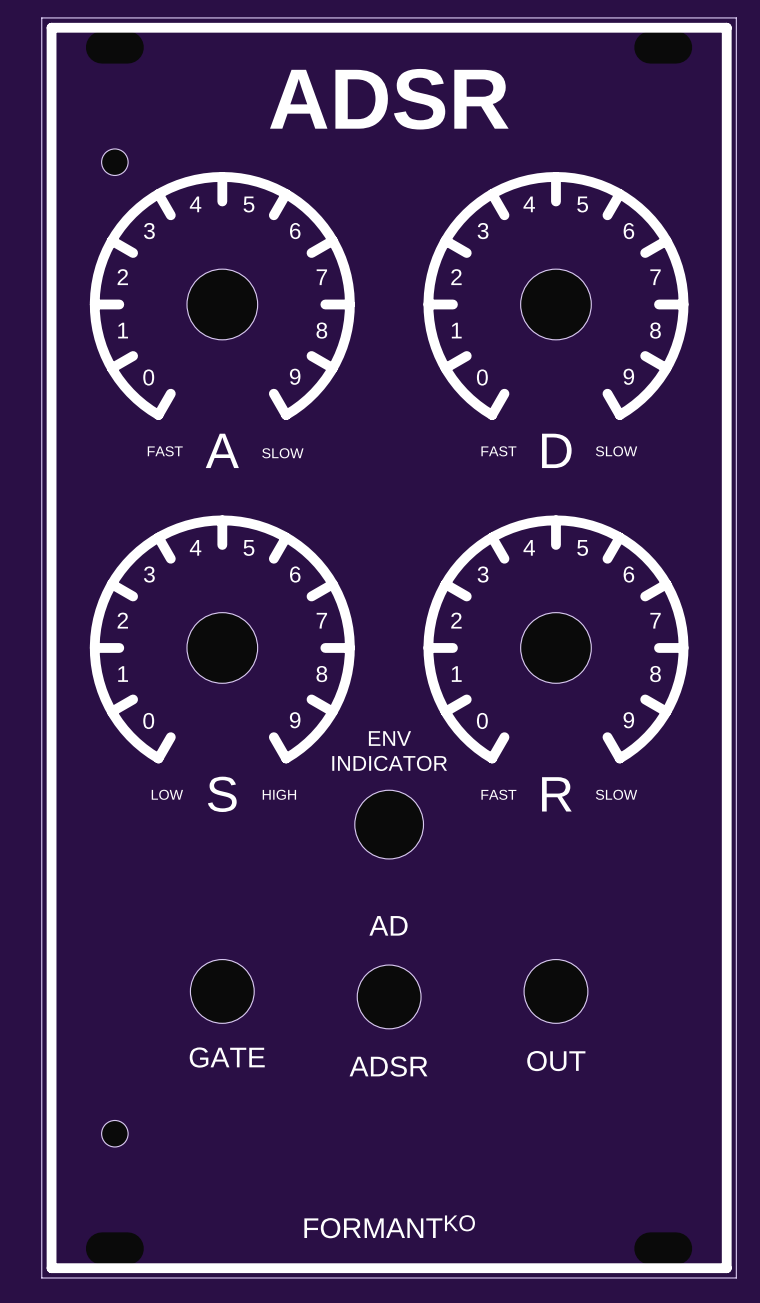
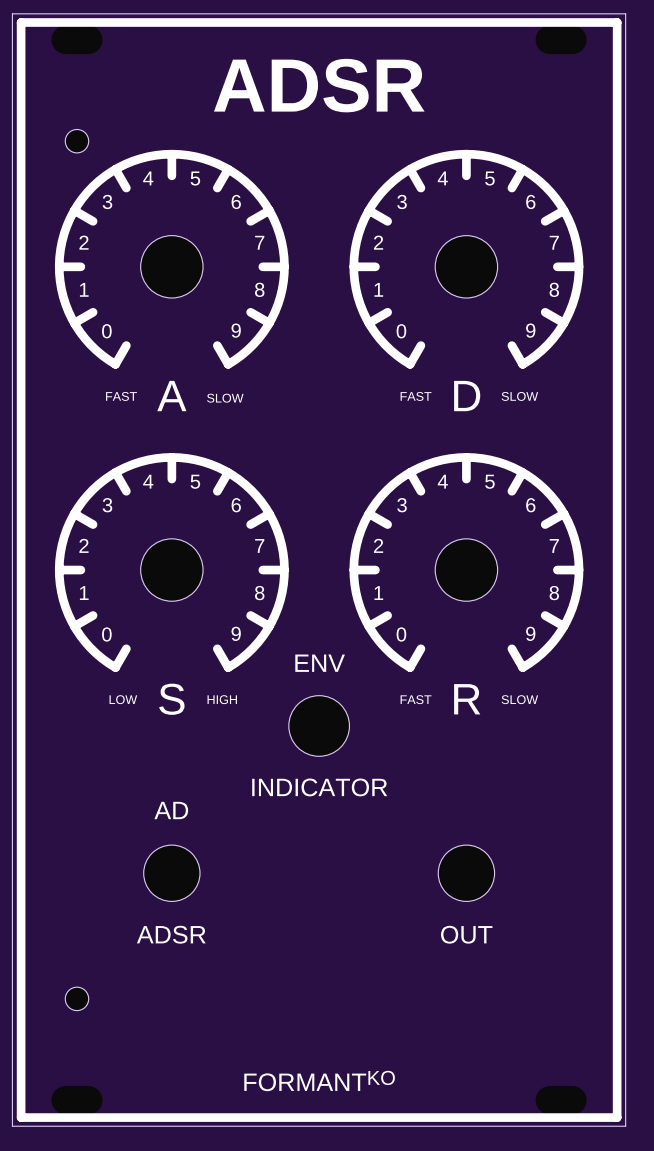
text: ENV (389, 738) -> none
text: INDICATOR (389, 763) -> ENV (320, 663)
text: none -> INDICATOR (319, 787)
text position: AD (388, 925) -> AD (171, 810)
part: (389, 996) -> none
text: GATE (227, 1057) -> ADSR (171, 934)
text: ADSR (388, 1066) -> none

